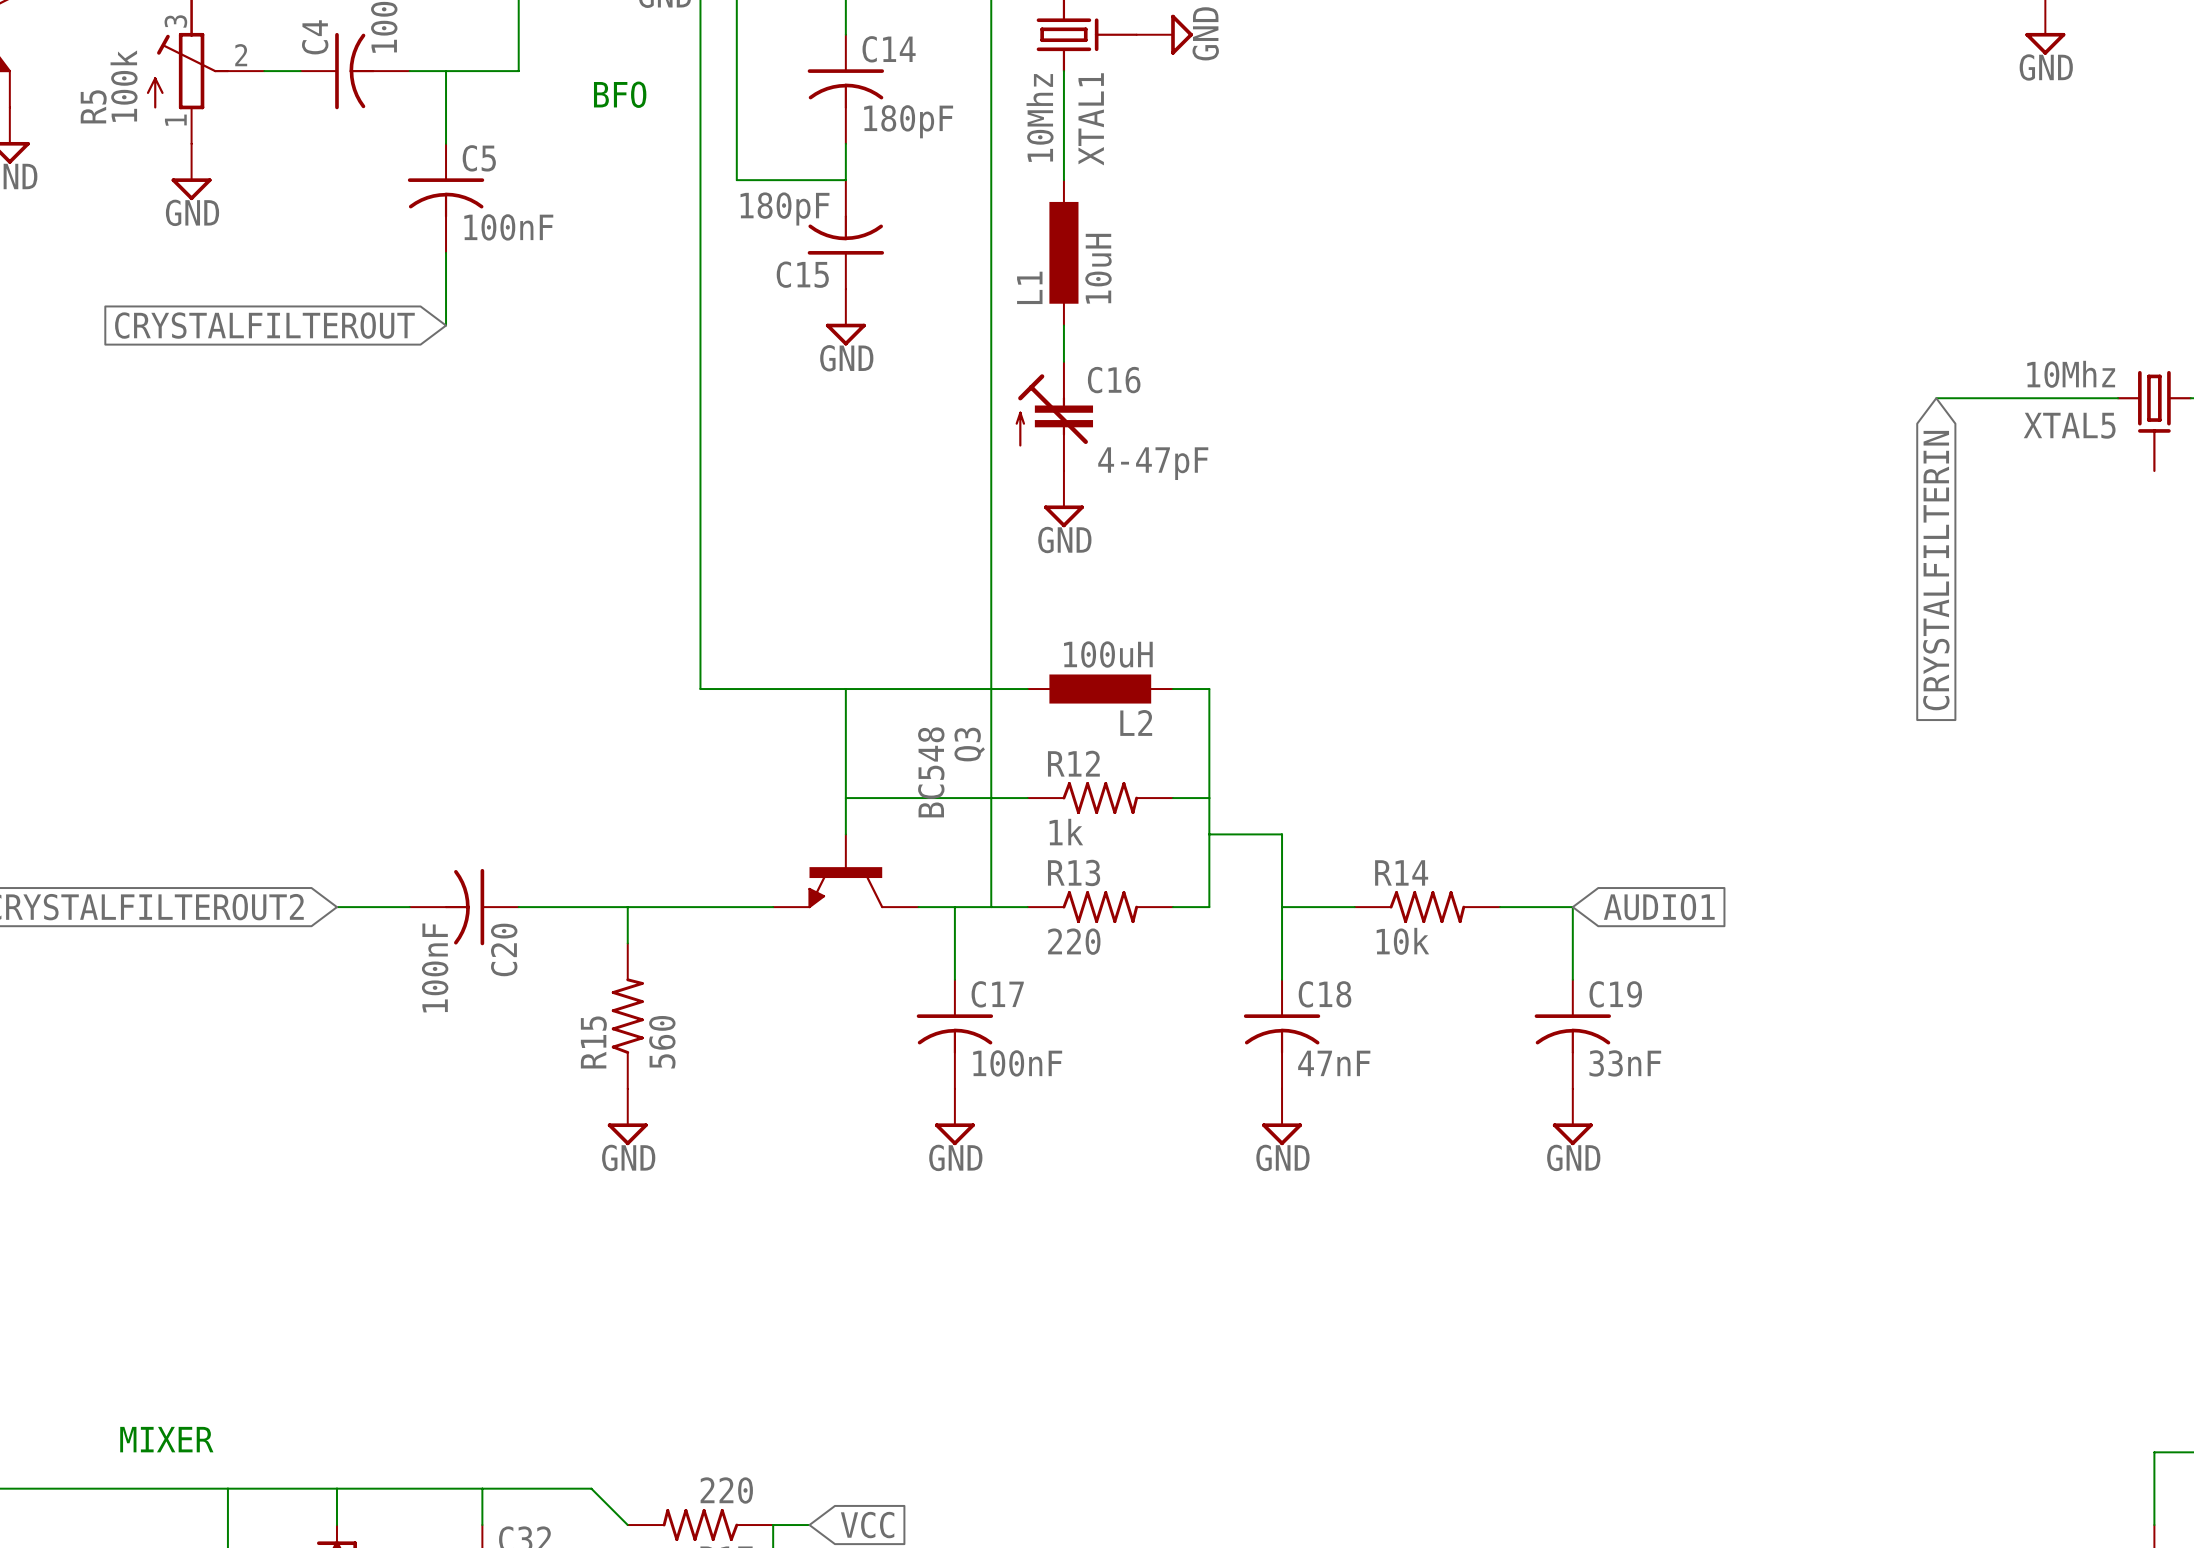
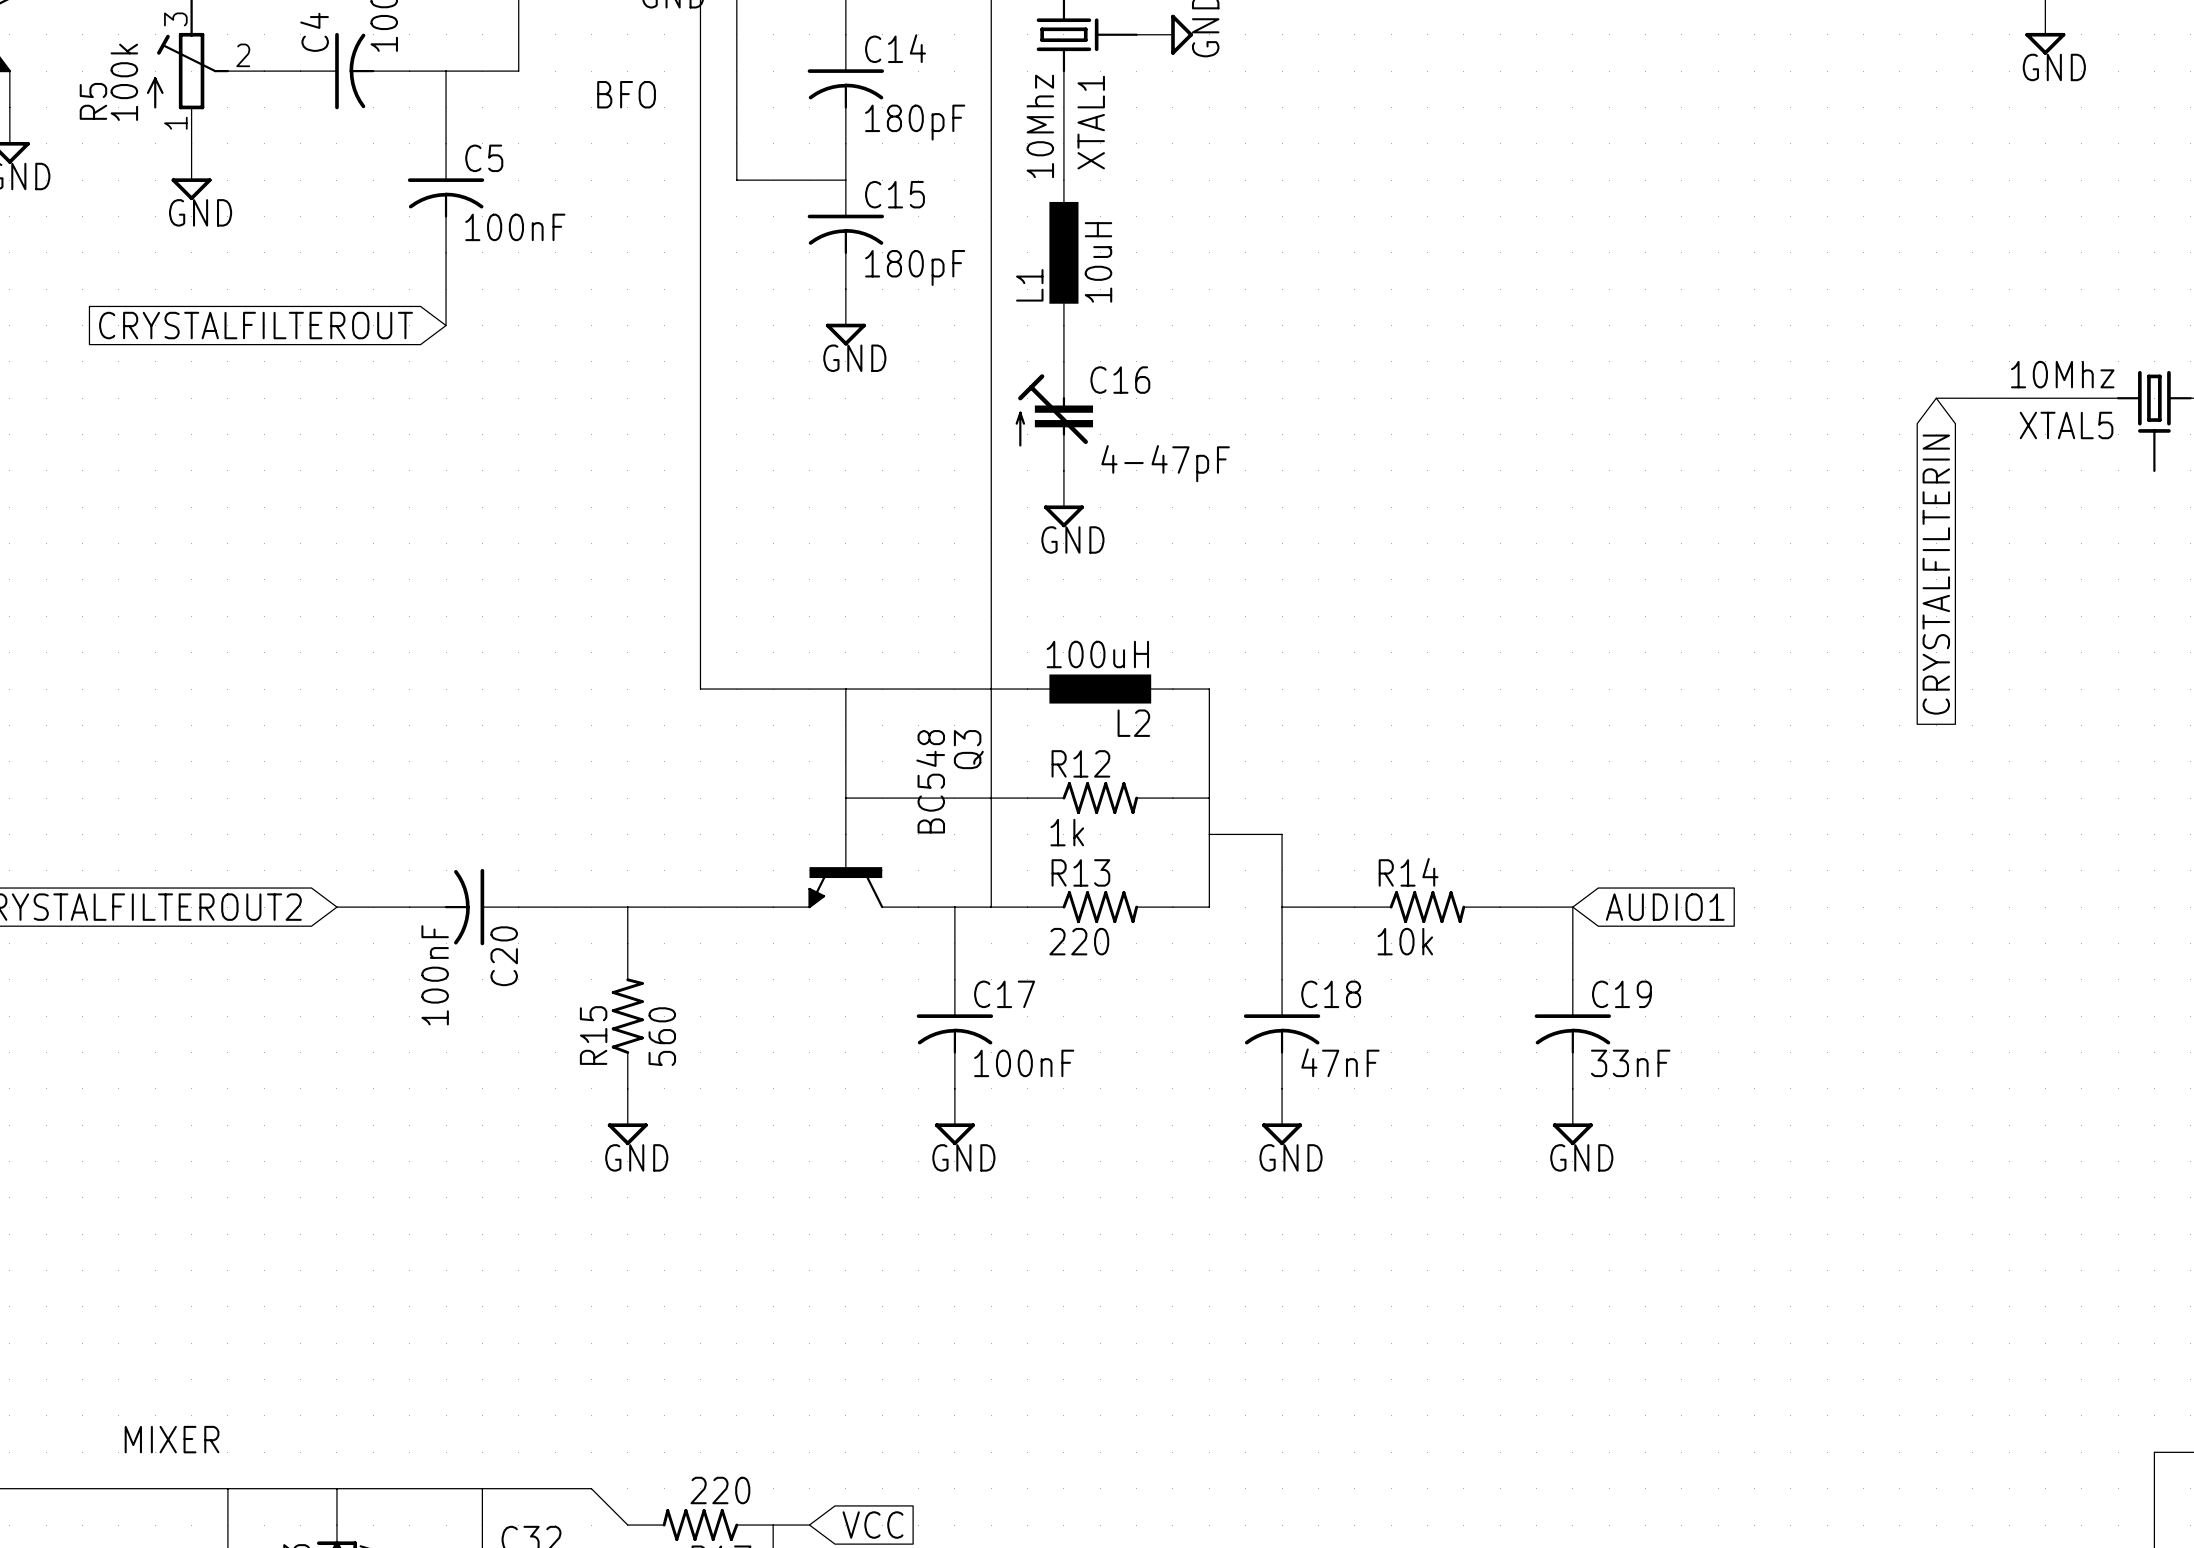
C15 rotation: 0° (845, 235) -> 180° (845, 234)

